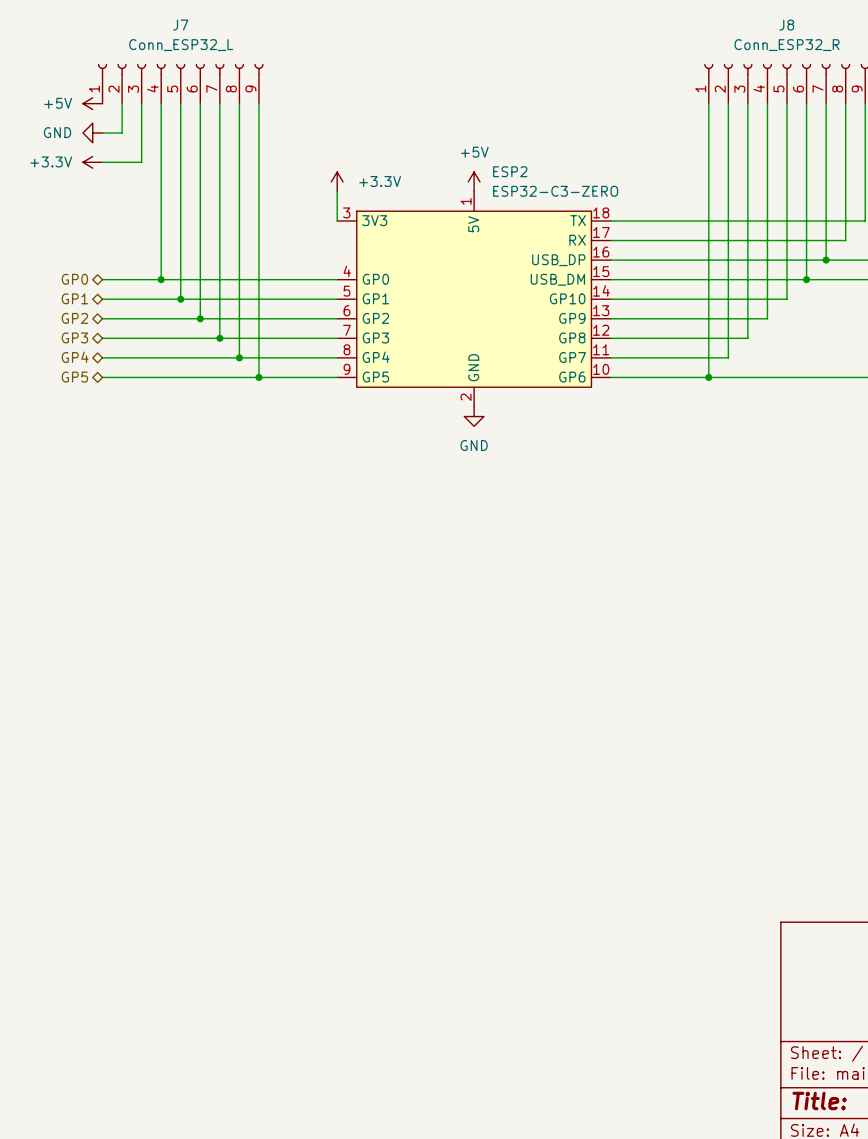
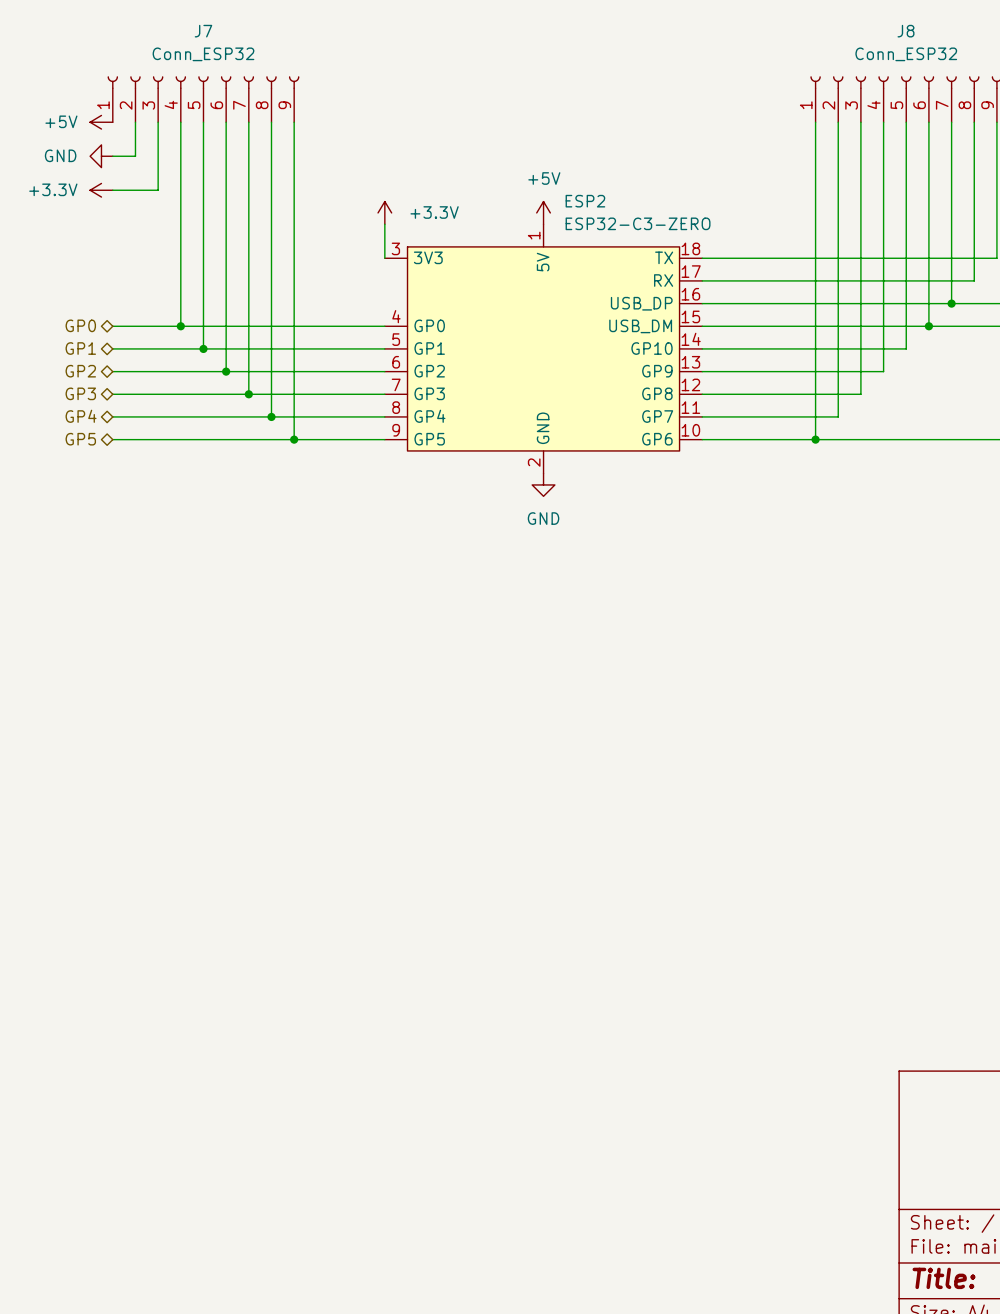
J7 value: Conn_ESP32_L (181, 45) -> Conn_ESP32 (203, 54)
J8 value: Conn_ESP32_R (787, 45) -> Conn_ESP32 (906, 54)

